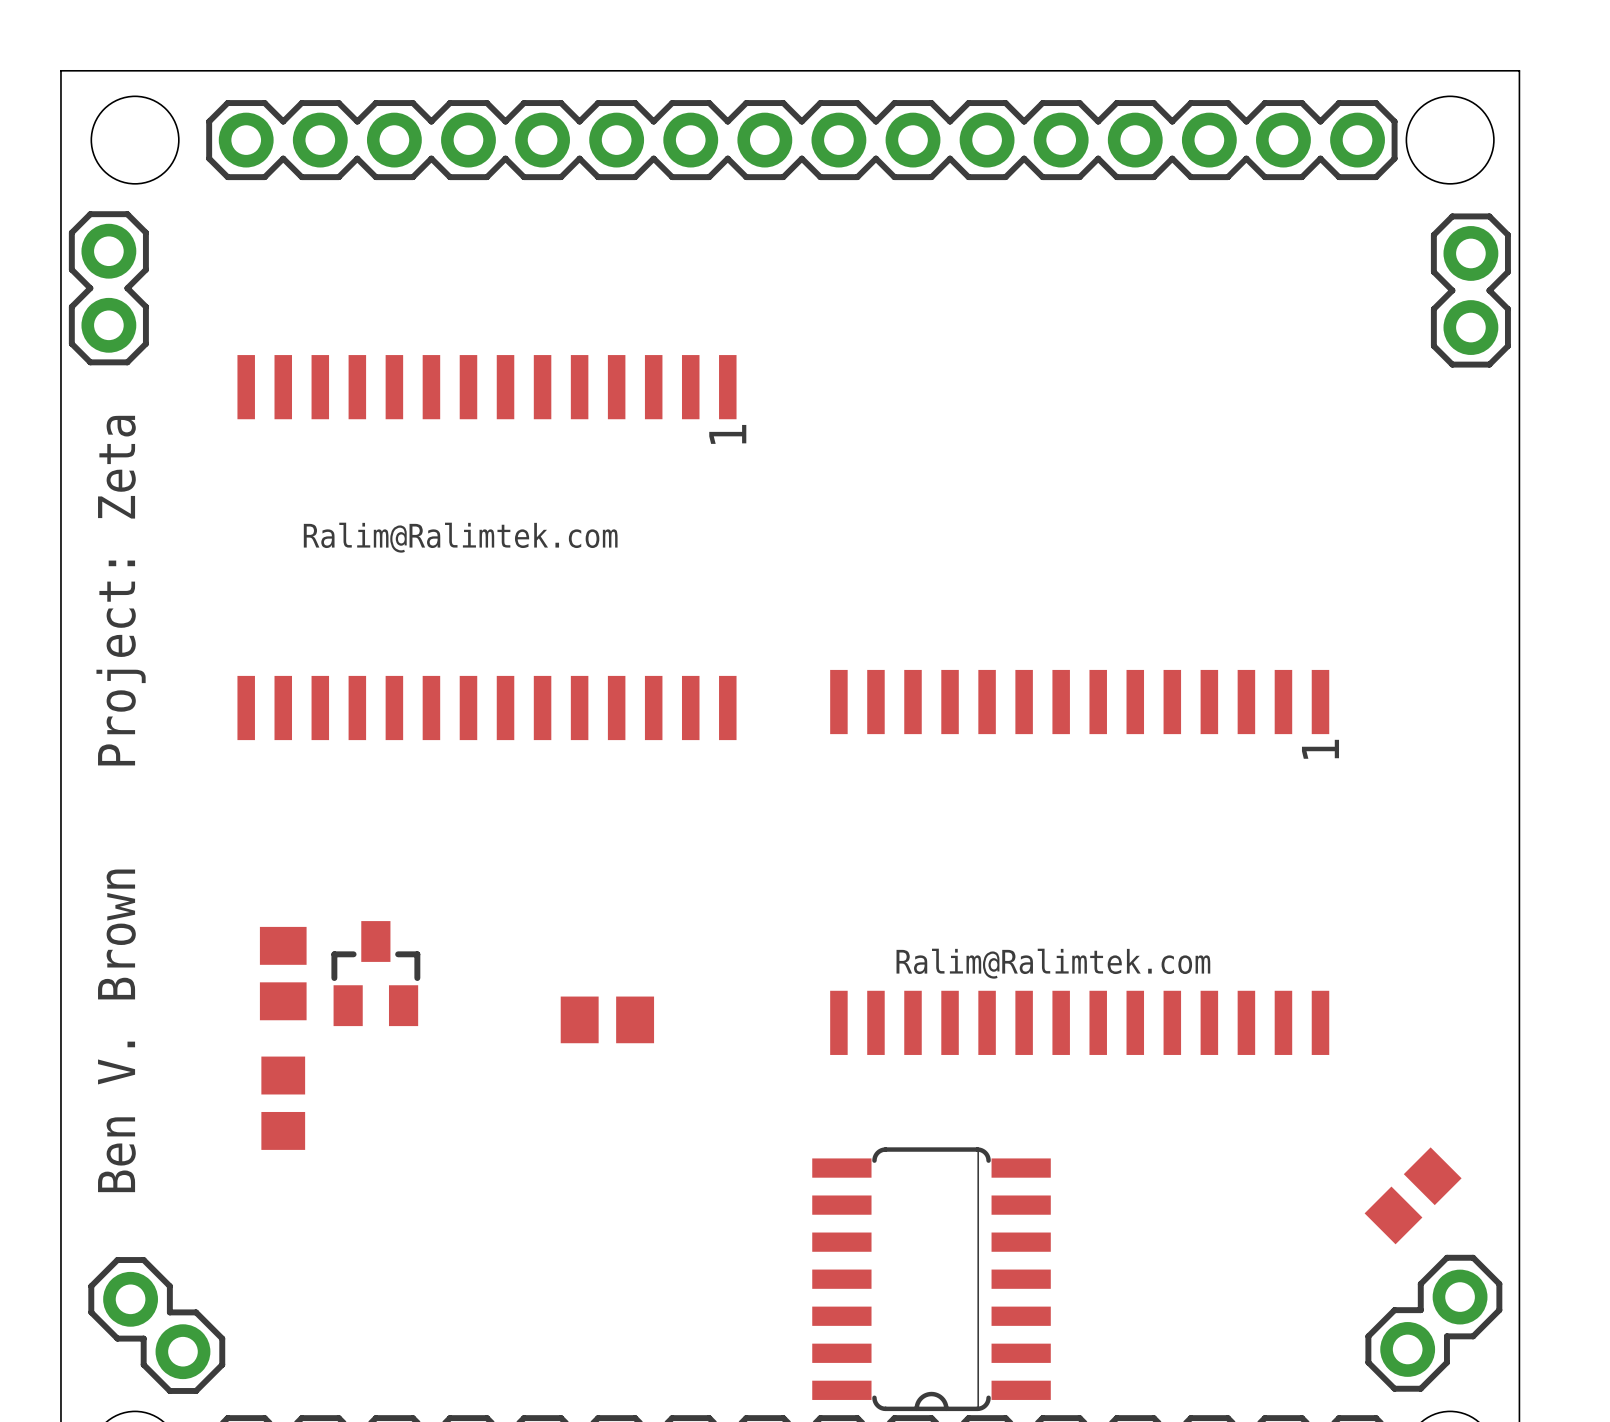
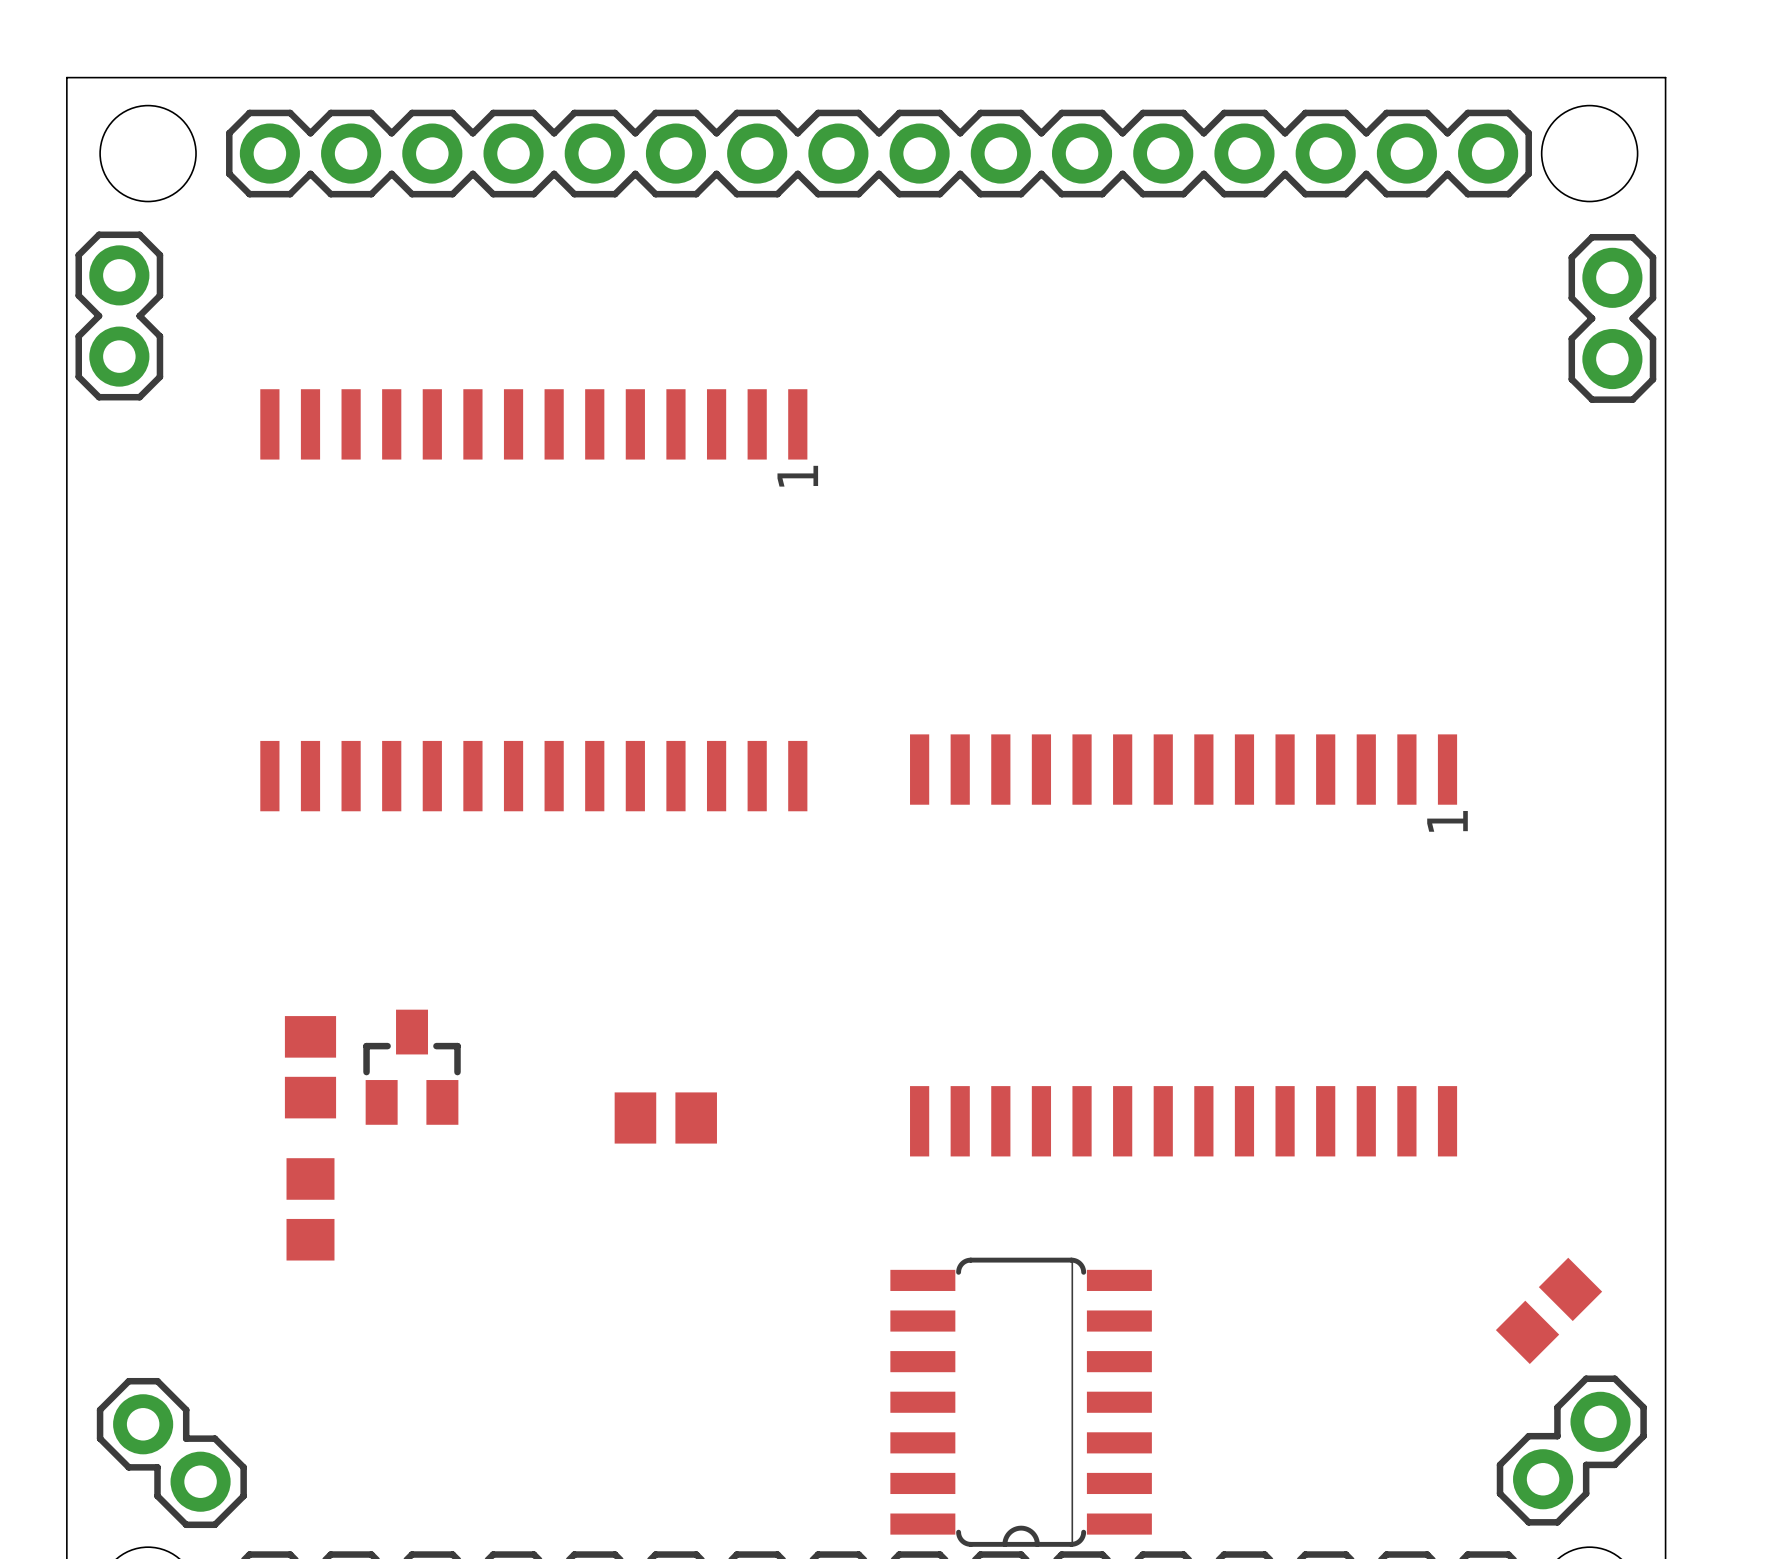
text: Ralim@Ralimtek.com (460, 537) -> none
text: Project: Zeta (121, 590) -> none
text: Ralim@Ralimtek.com (1053, 963) -> none
text: Ben V. Brown (116, 1030) -> none

